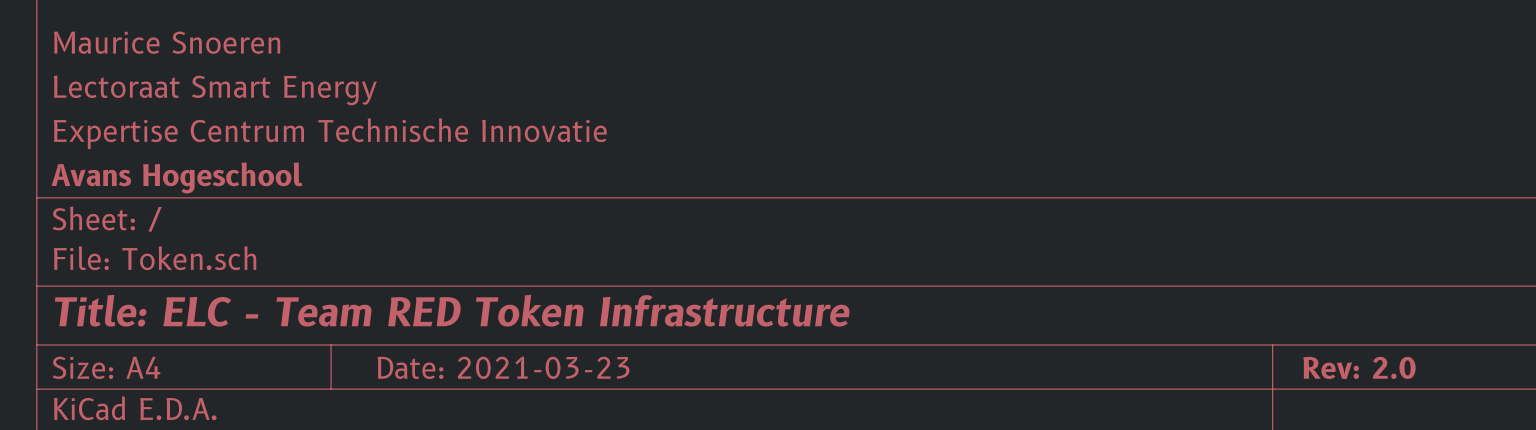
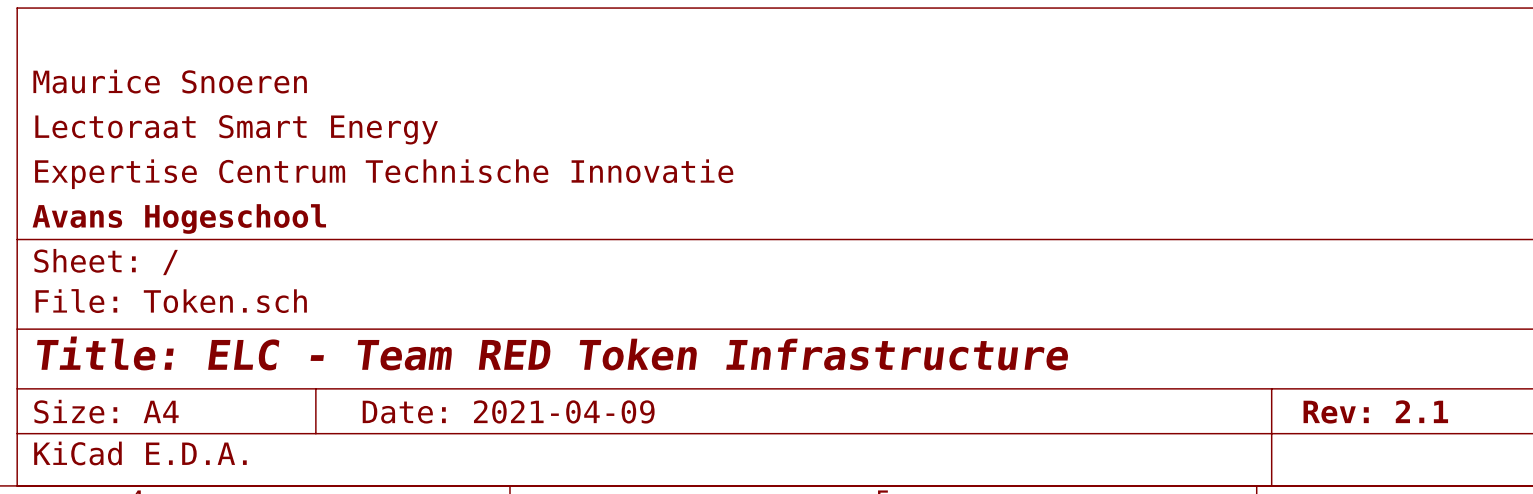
title block: Date: 2021-03-23 (503, 367) -> Date: 2021-04-09 (508, 411)
title block: Rev: 2.0 (1359, 367) -> Rev: 2.1 (1375, 411)

